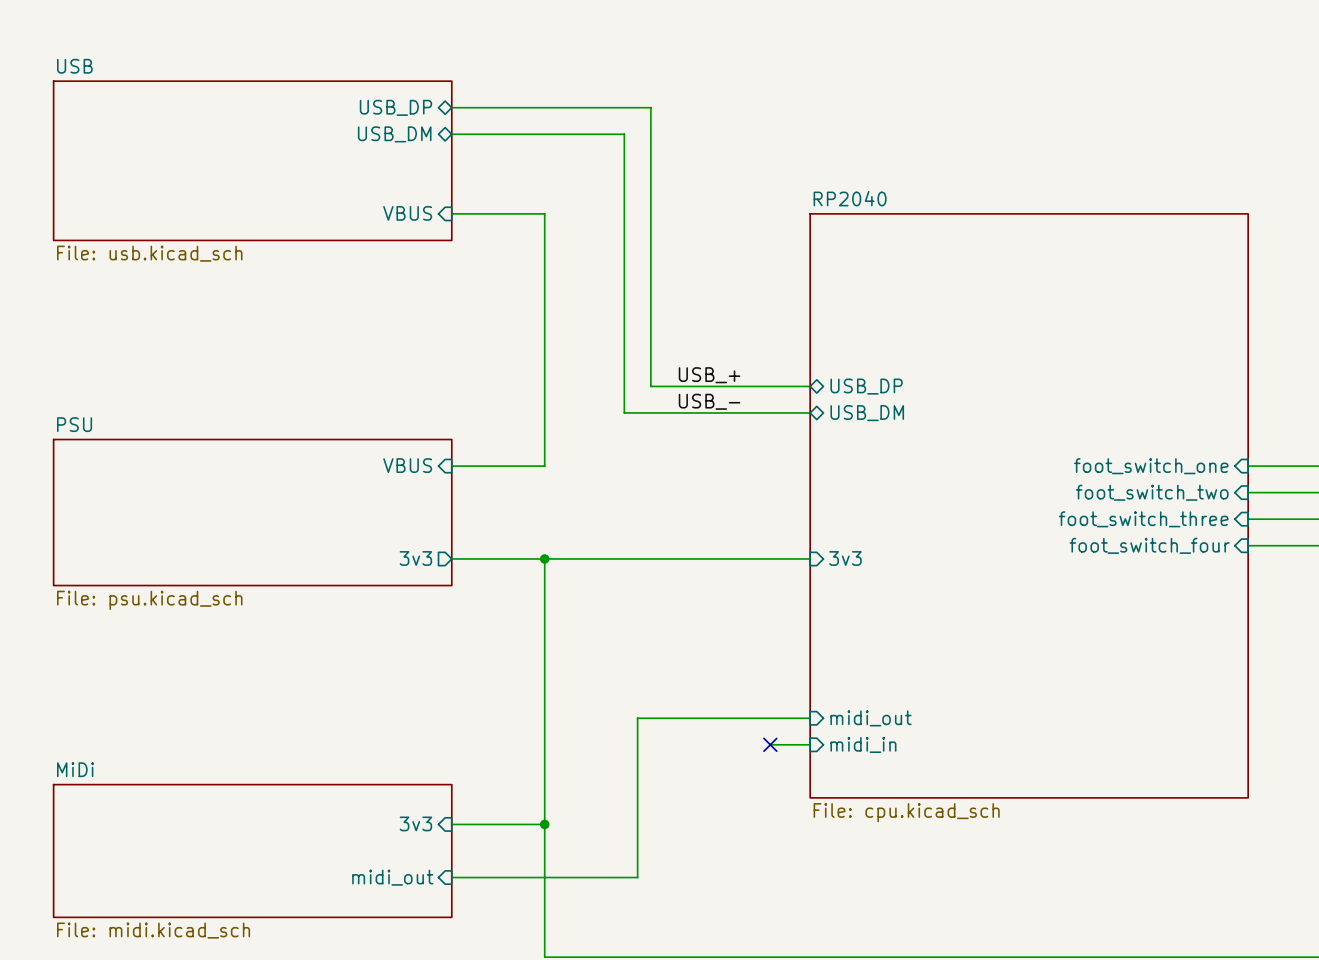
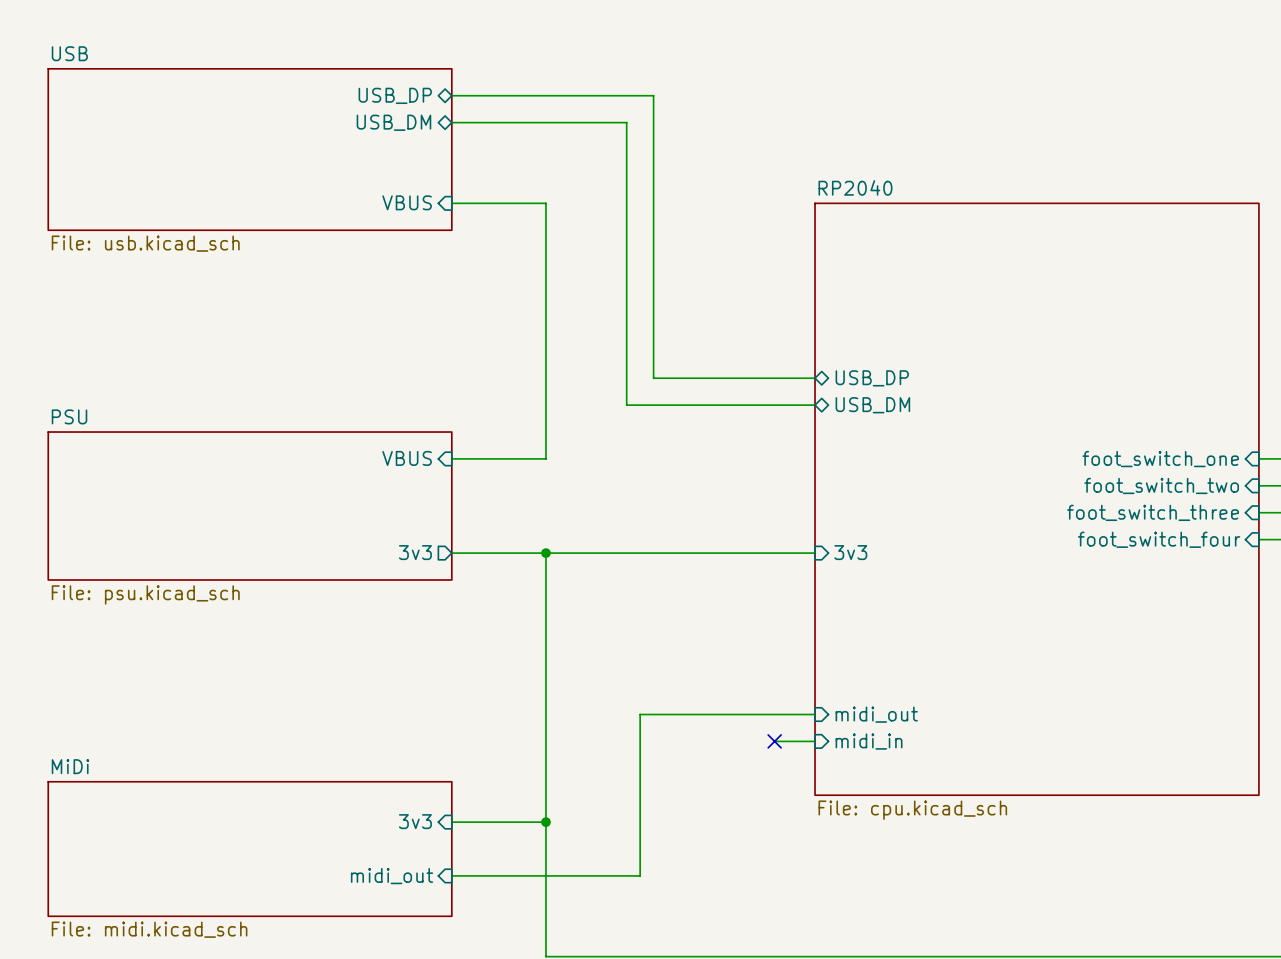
label: USB_+ (709, 375) -> none
label: USB_- (709, 401) -> none

